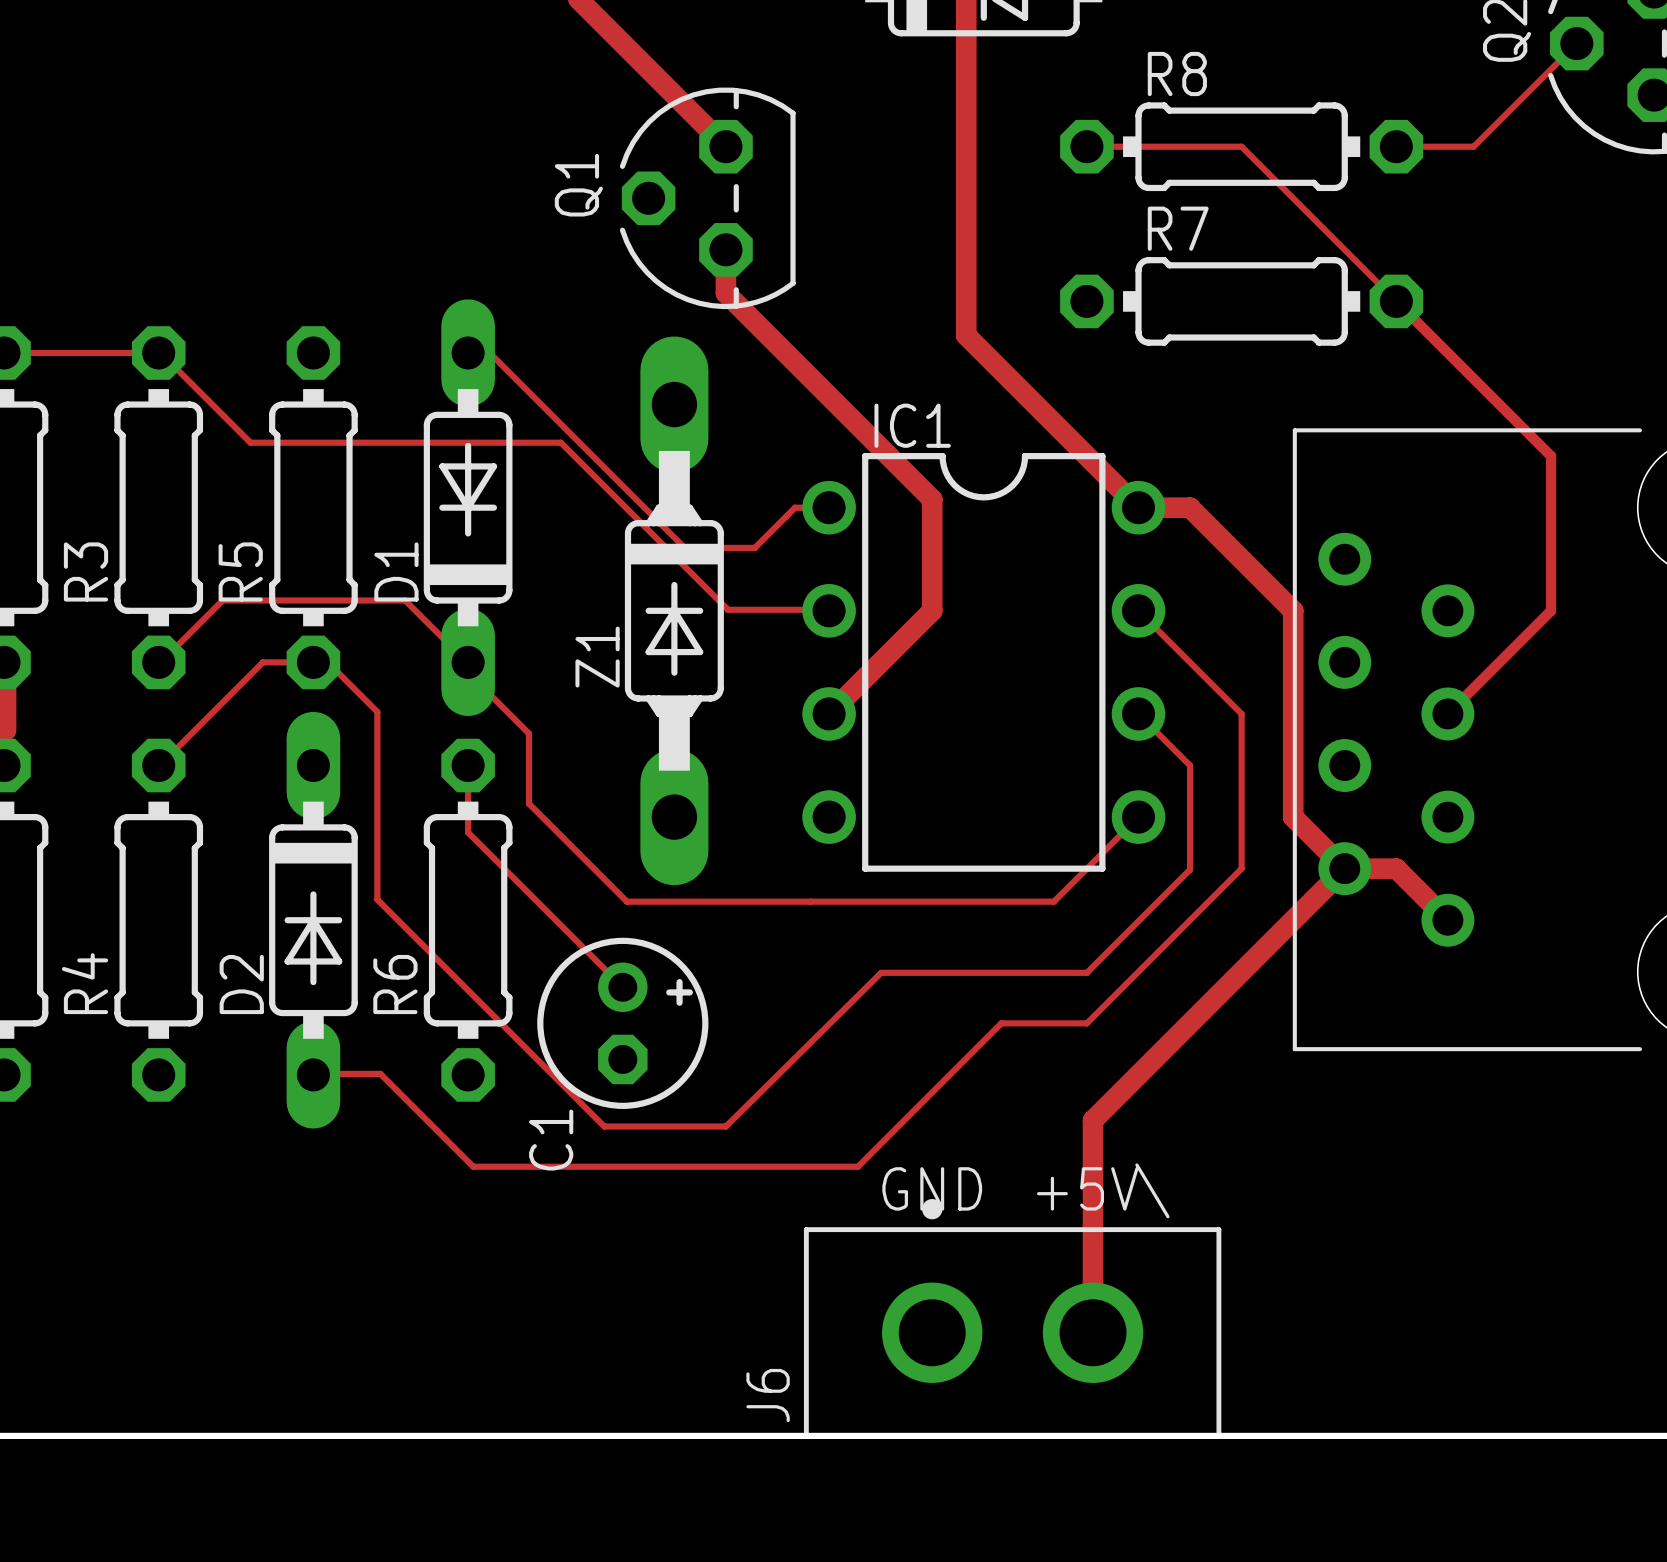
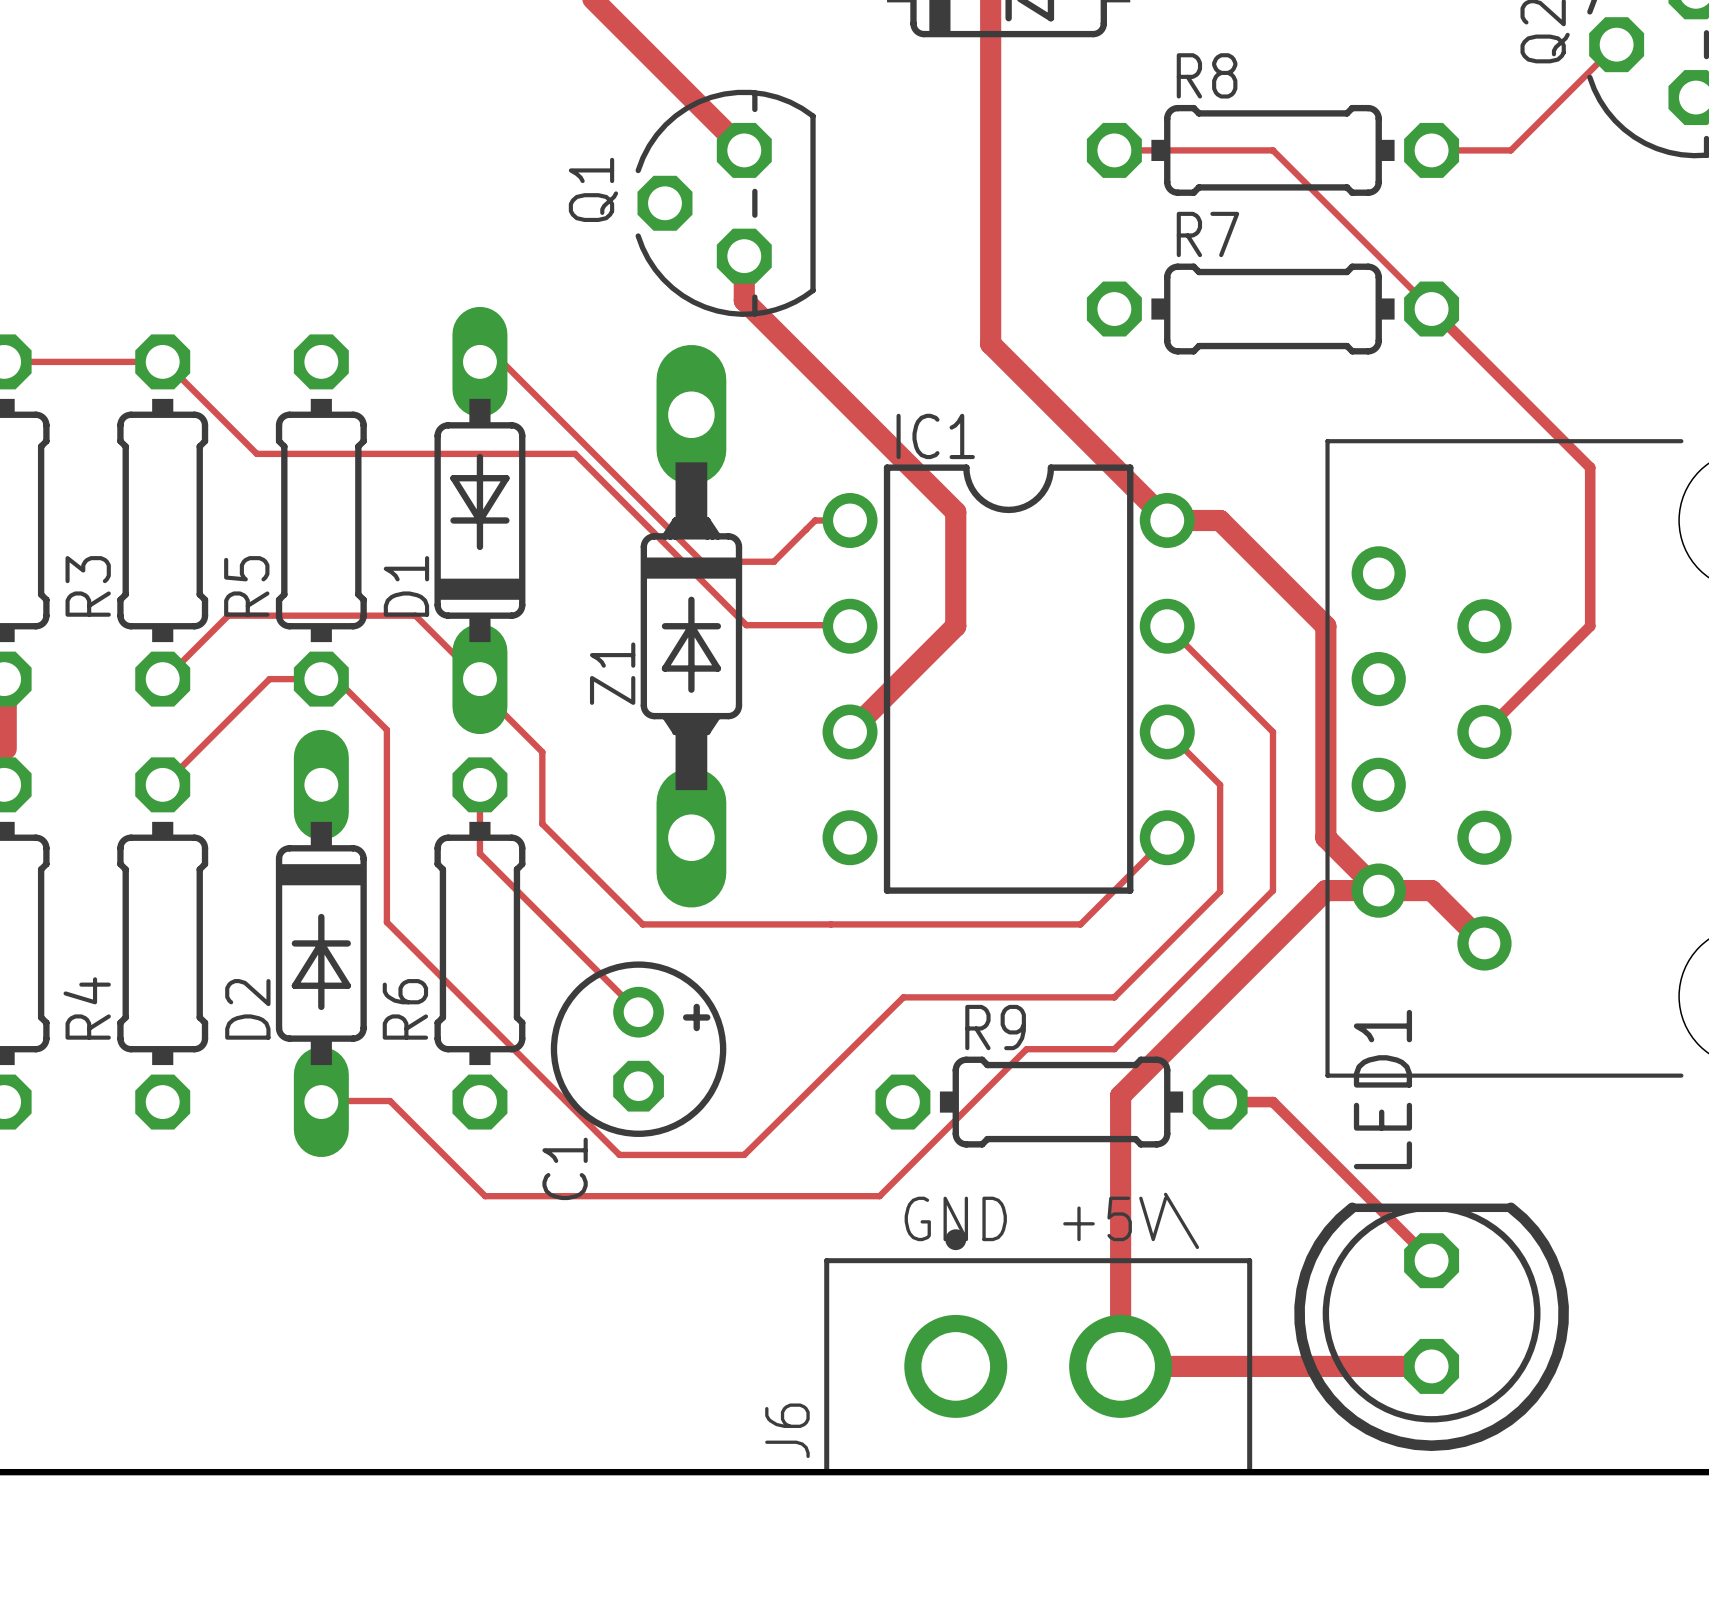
track: (1344, 868) (1093, 1120) -> (1378, 890) (1325, 890) (1120, 1095) (1120, 1148)
R9: none -> (1061, 1102)
track: none -> (1220, 1102) (1272, 1102) (1431, 1260)
LED1: none -> (1431, 1326)
track: none -> (1120, 1366) (1431, 1366)

